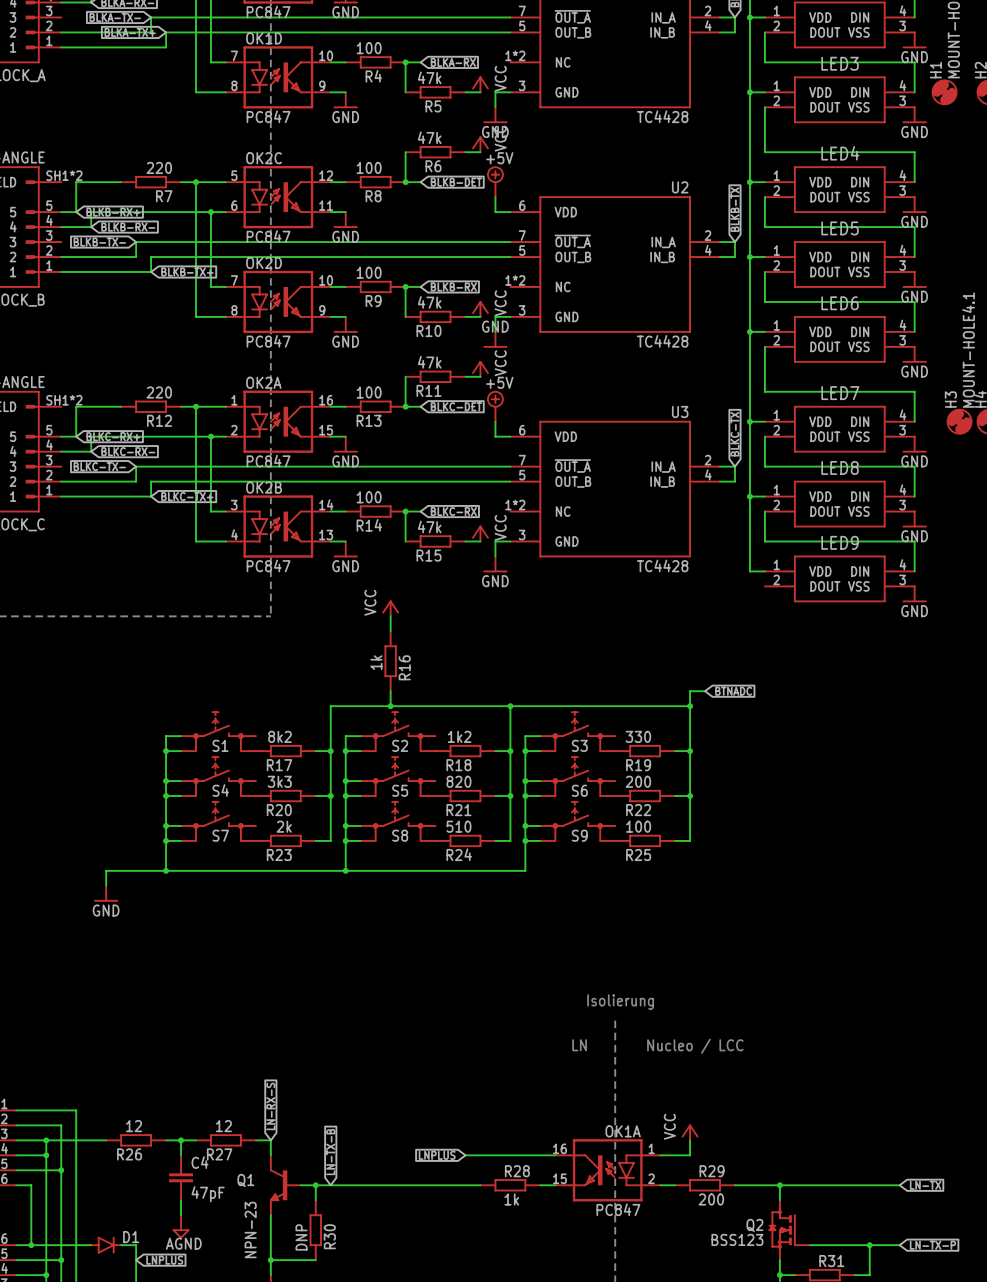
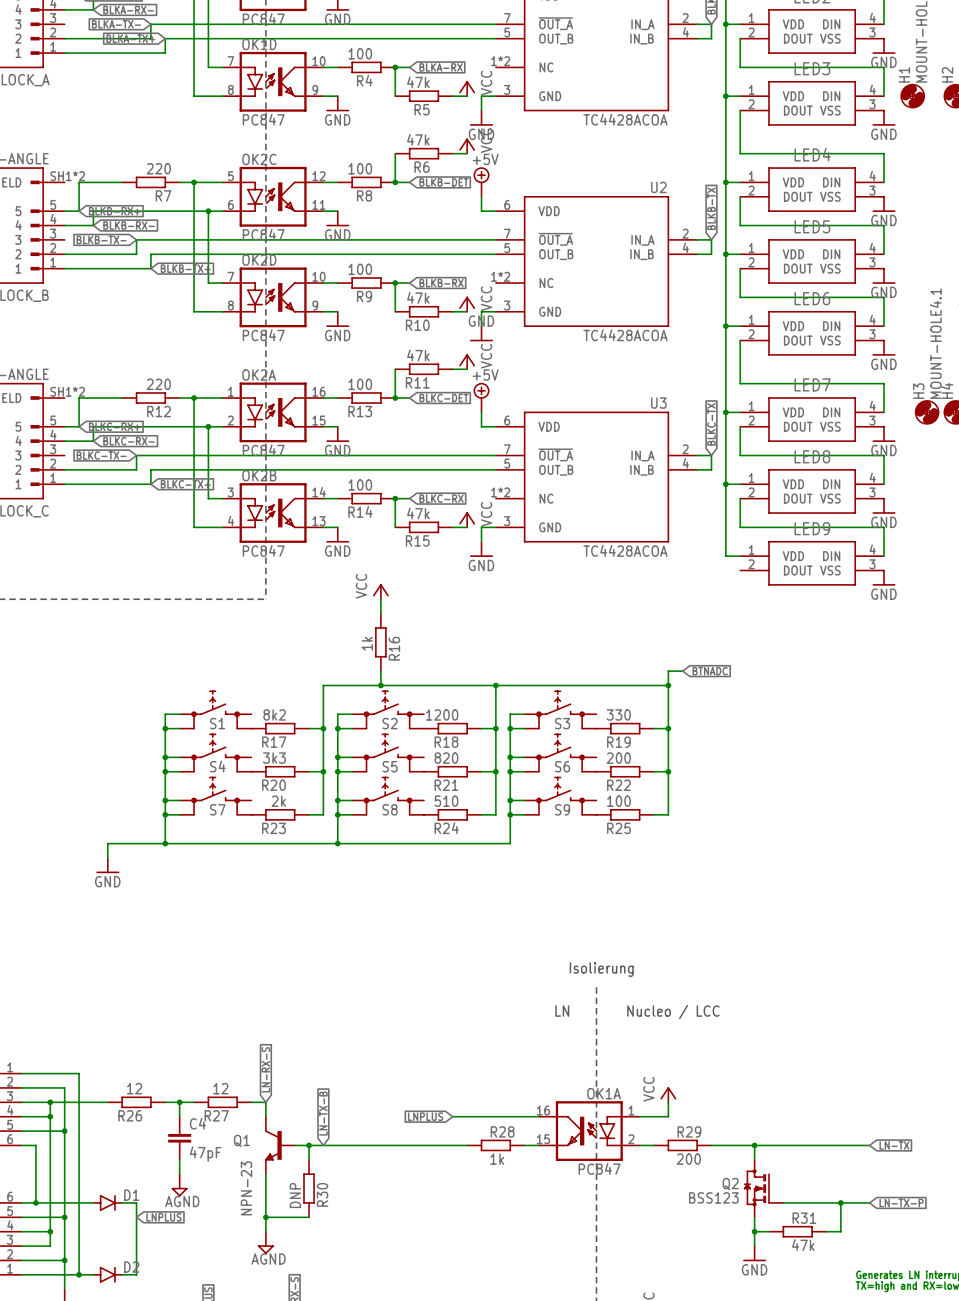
part value: TC4428 (662, 116) -> TC4428ACOA (625, 119)
U2 value: TC4428 (662, 341) -> TC4428ACOA (625, 335)
U3 value: TC4428 (662, 565) -> TC4428ACOA (625, 550)
R18 value: 1k2 (459, 736) -> 1200 (442, 714)

